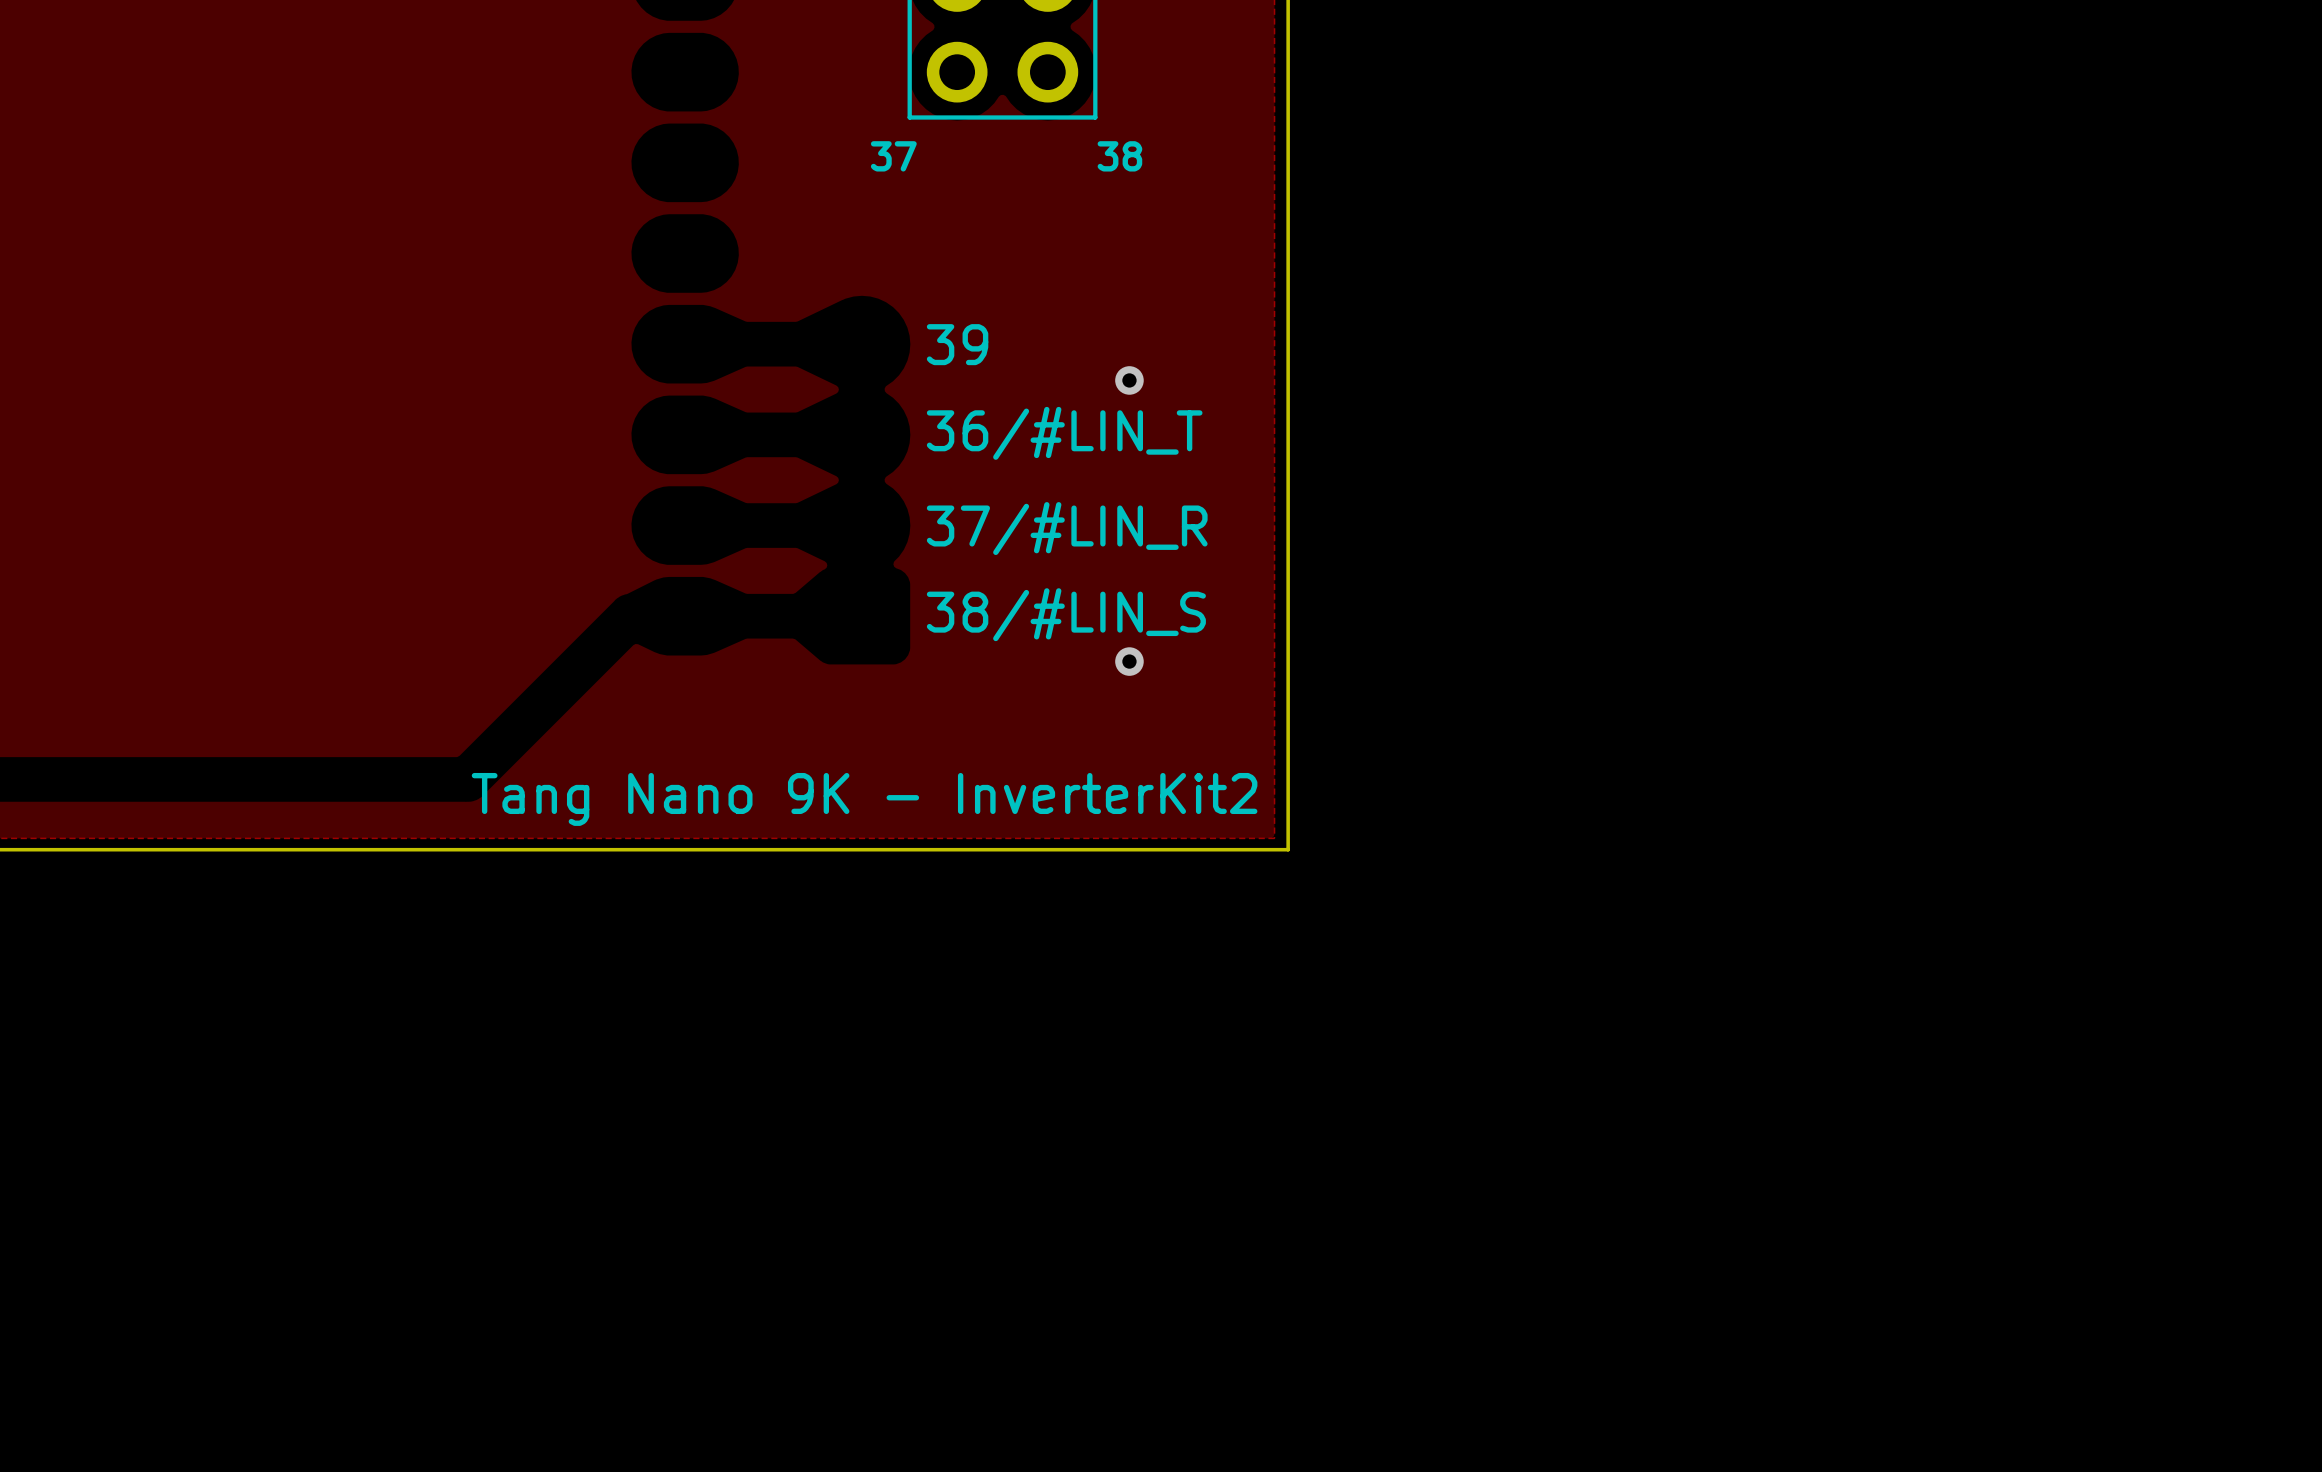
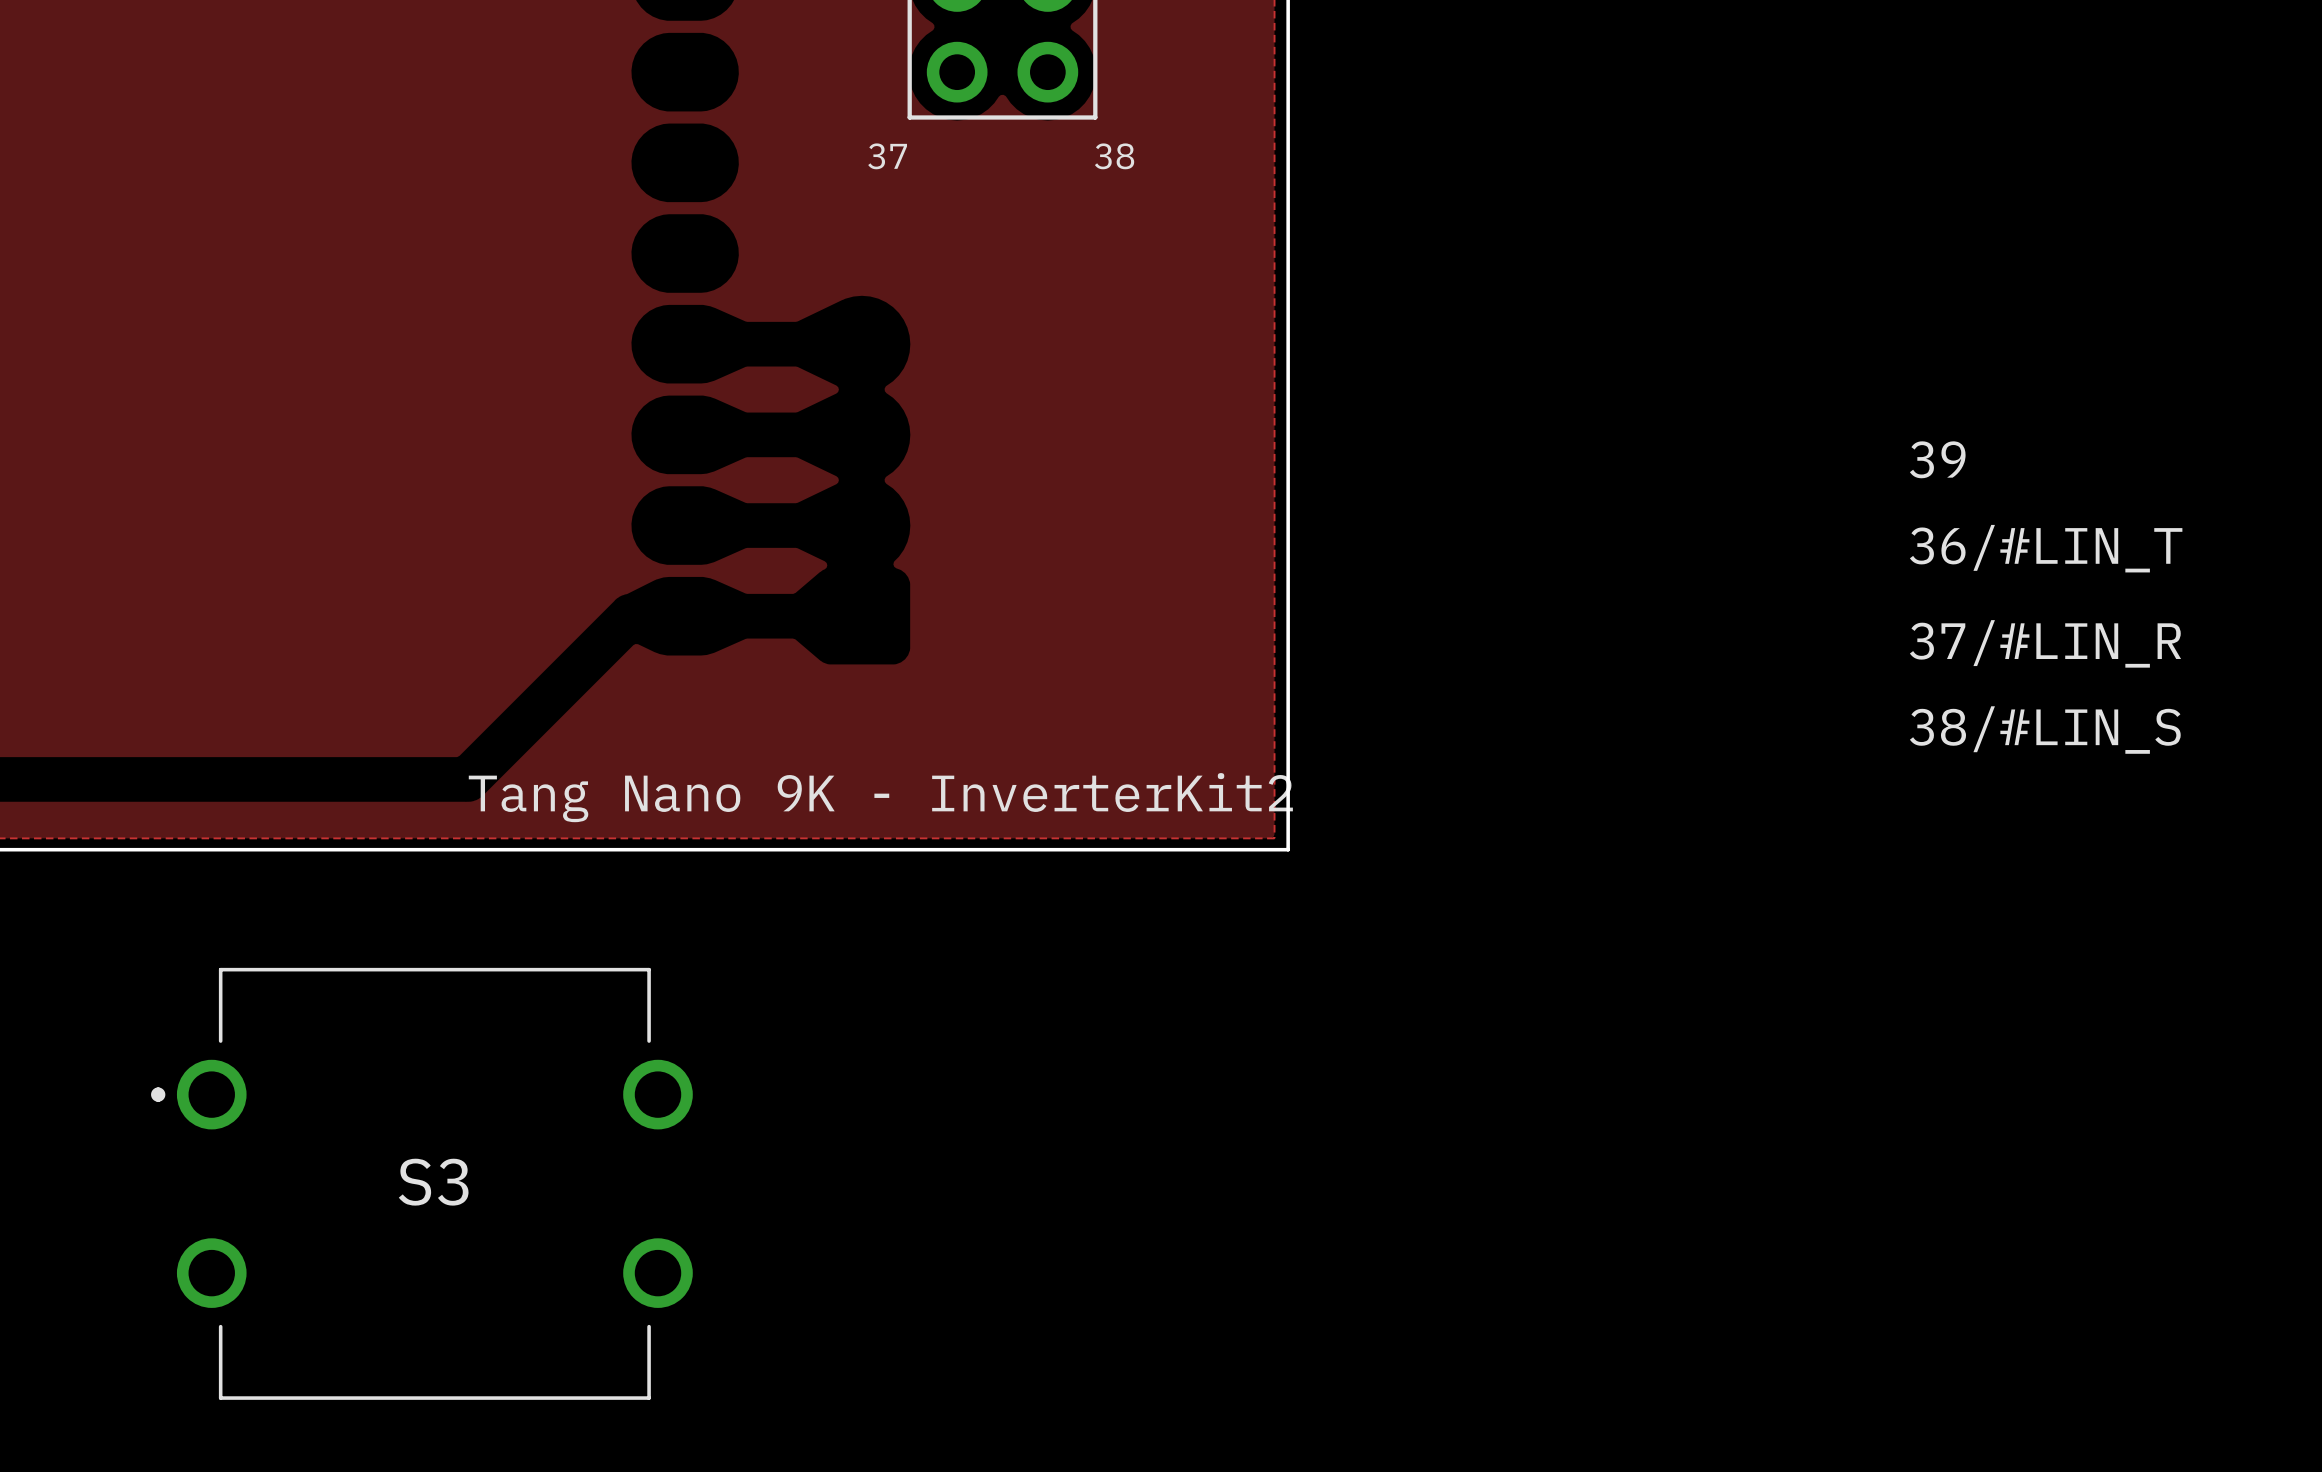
text: 39 (957, 344) -> none
via: (1129, 380) -> none
text: 36/#LIN_T (1064, 433) -> none
text: none -> 39 (1937, 459)
text: 37/#LIN_R (1067, 528) -> none
text: none -> 36/#LIN_T (2046, 548)
text: 38/#LIN_S (1066, 614) -> none
text: none -> 37/#LIN_R (2045, 643)
via: (1129, 661) -> none
text: none -> 38/#LIN_S (2045, 730)
S3: none -> (421, 1183)

